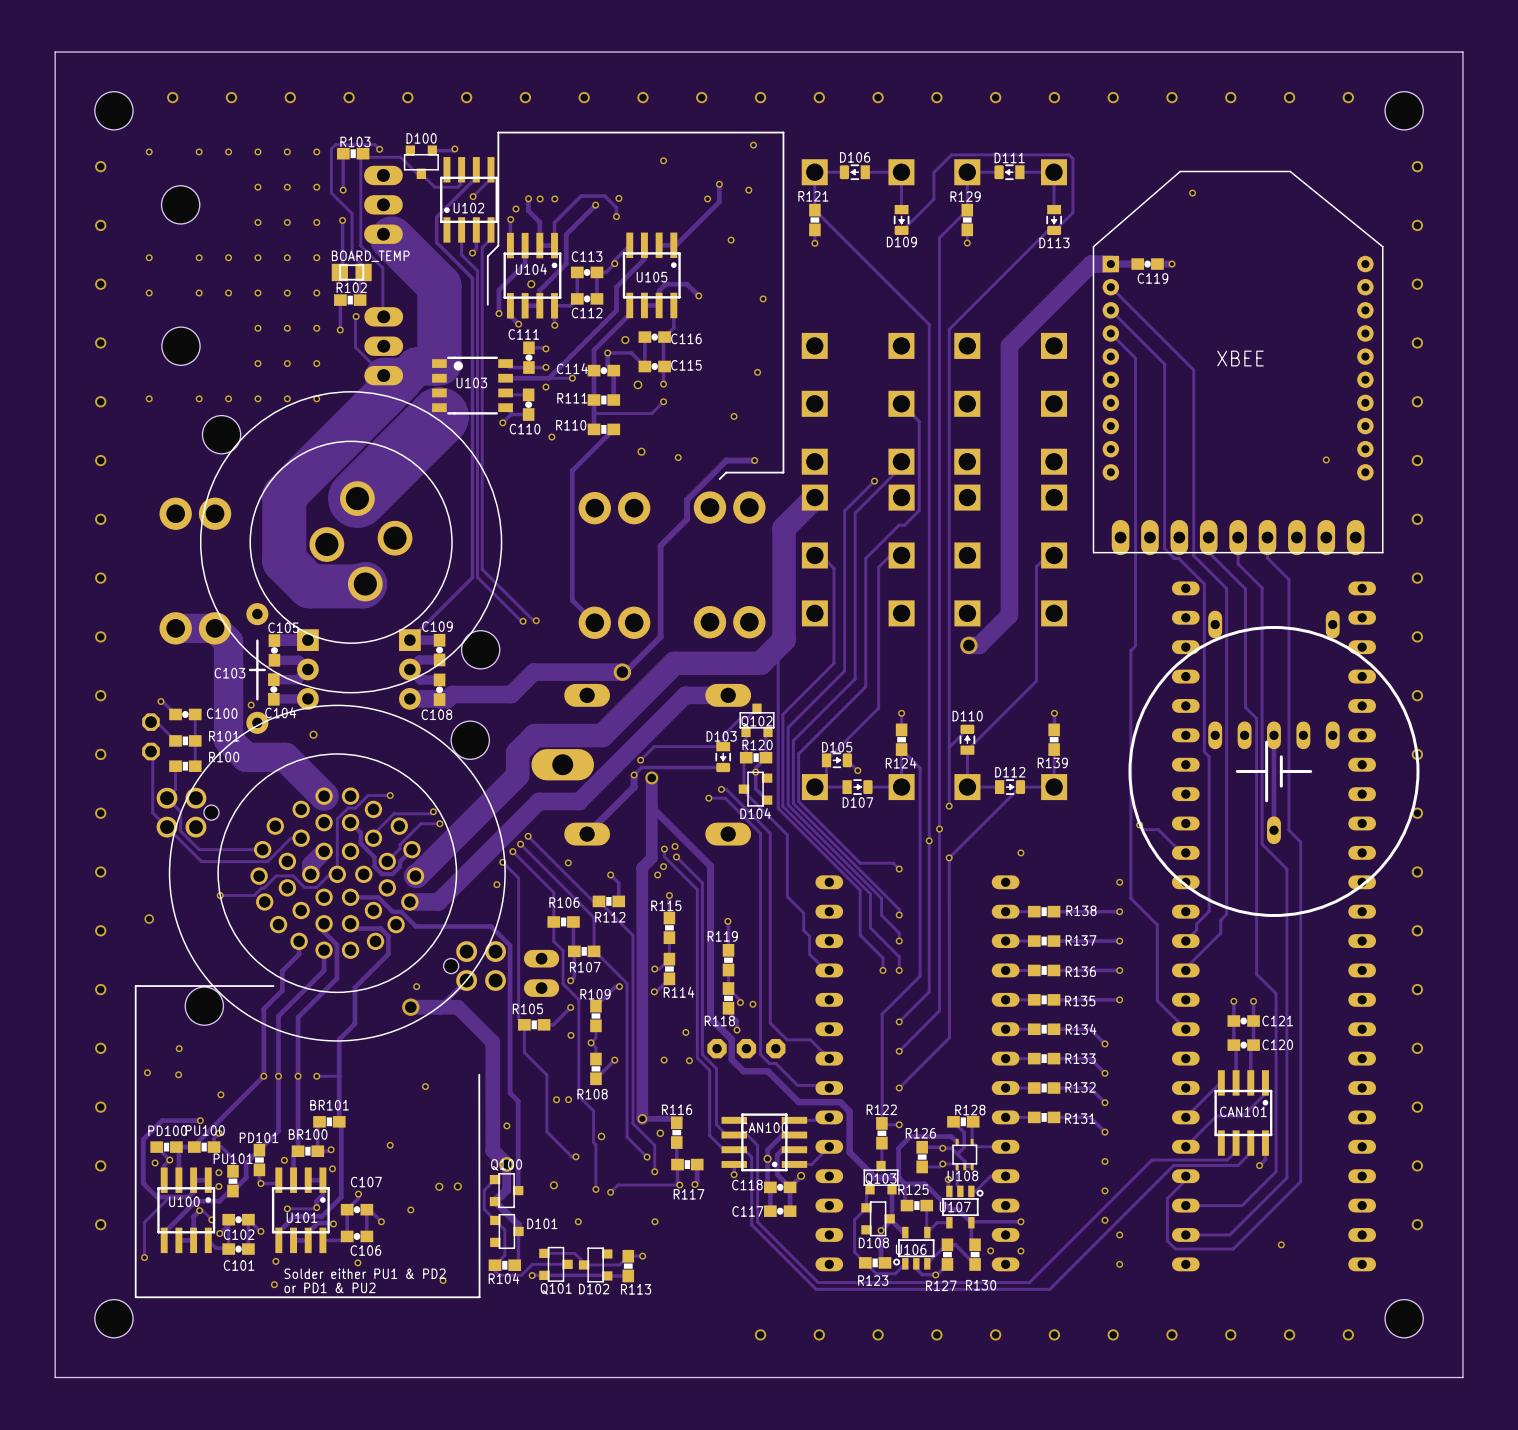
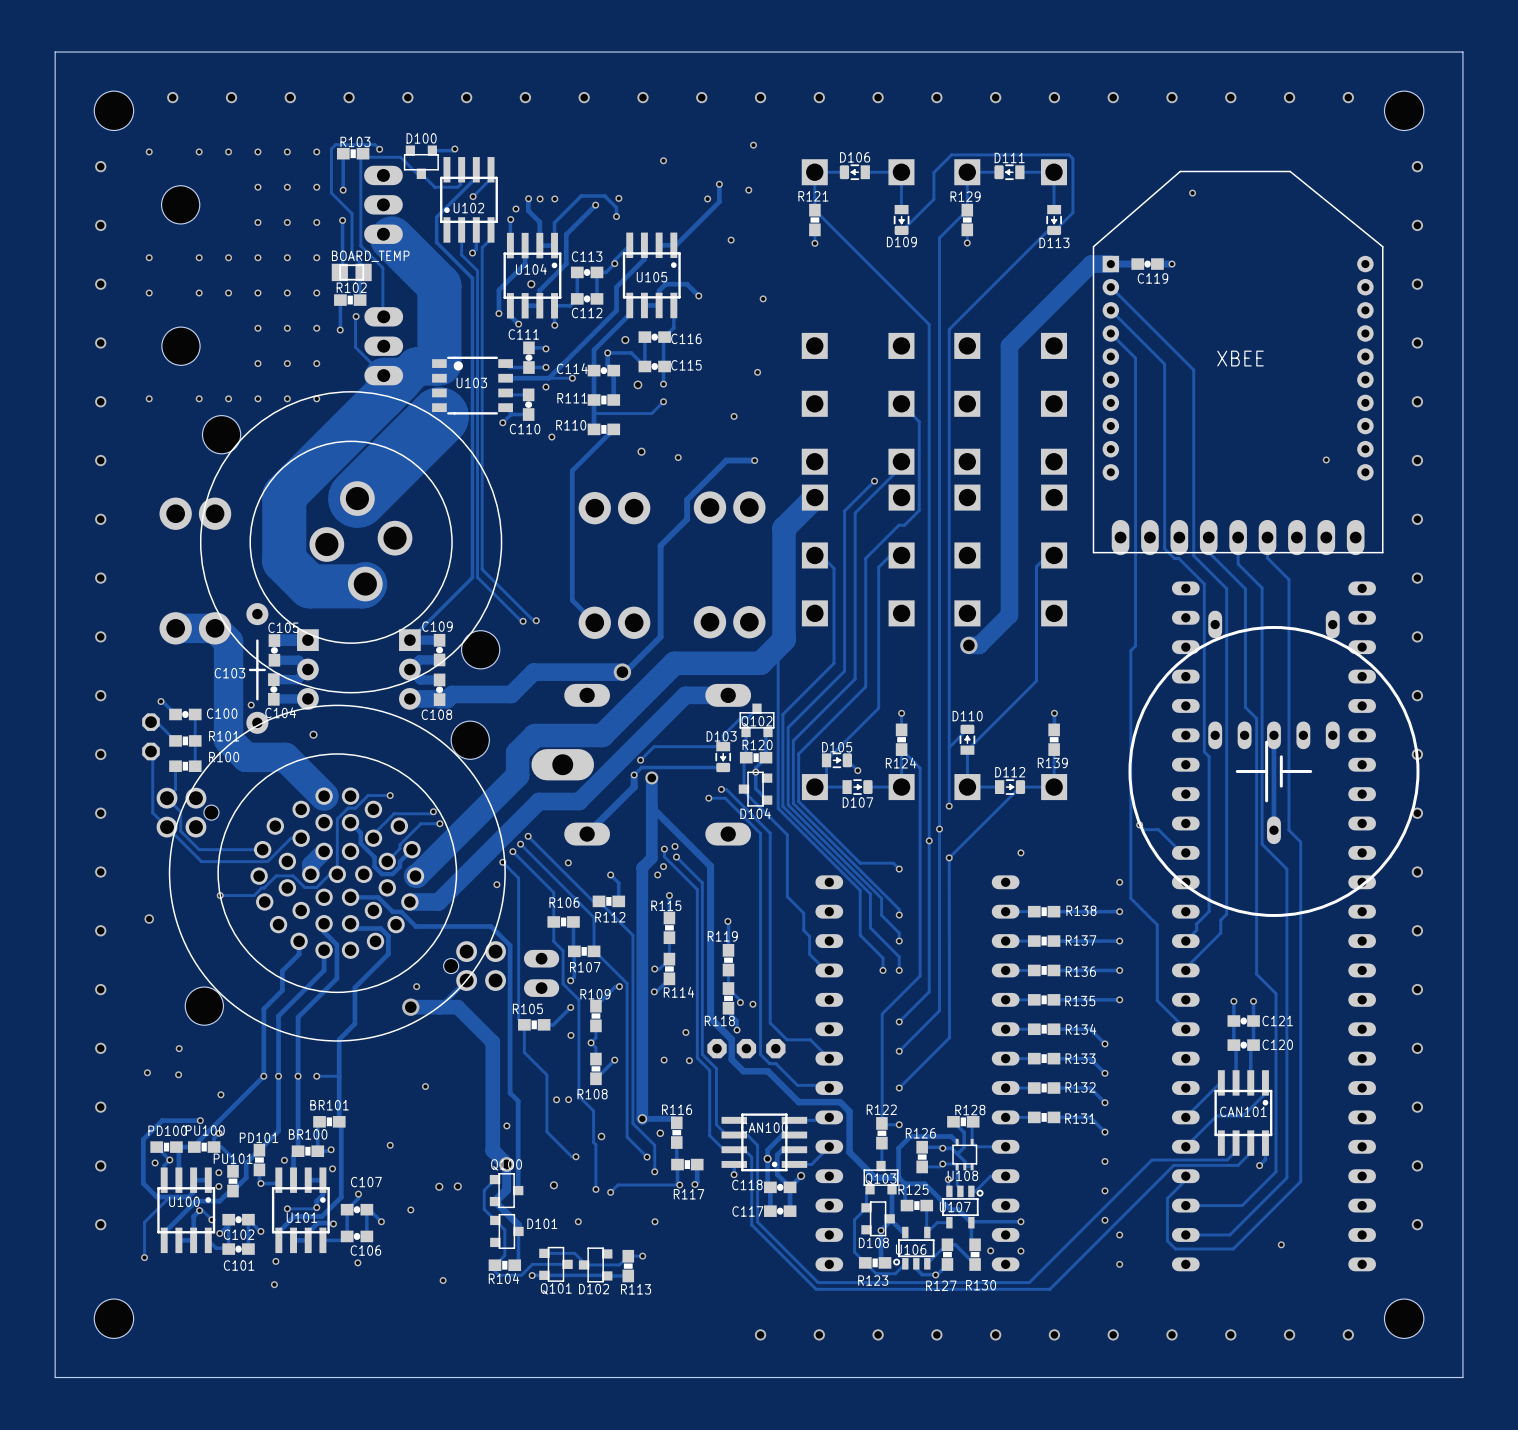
hole: (113, 110) -> none
part: none -> (113, 110)
hole: (1404, 110) -> none
part: none -> (1404, 110)
line: (487, 304) (487, 256) (498, 245) (498, 132) (783, 132) (783, 472) (726, 472) (719, 479) -> none
line: (273, 986) (135, 986) (135, 1297) (479, 1297) (479, 1074) -> none
text: Solder either PU1 & PD2 (365, 1273) -> none
text: or PD1 & PU2 (329, 1287) -> none
hole: (113, 1318) -> none
part: none -> (113, 1318)
hole: (1404, 1318) -> none
part: none -> (1404, 1318)

